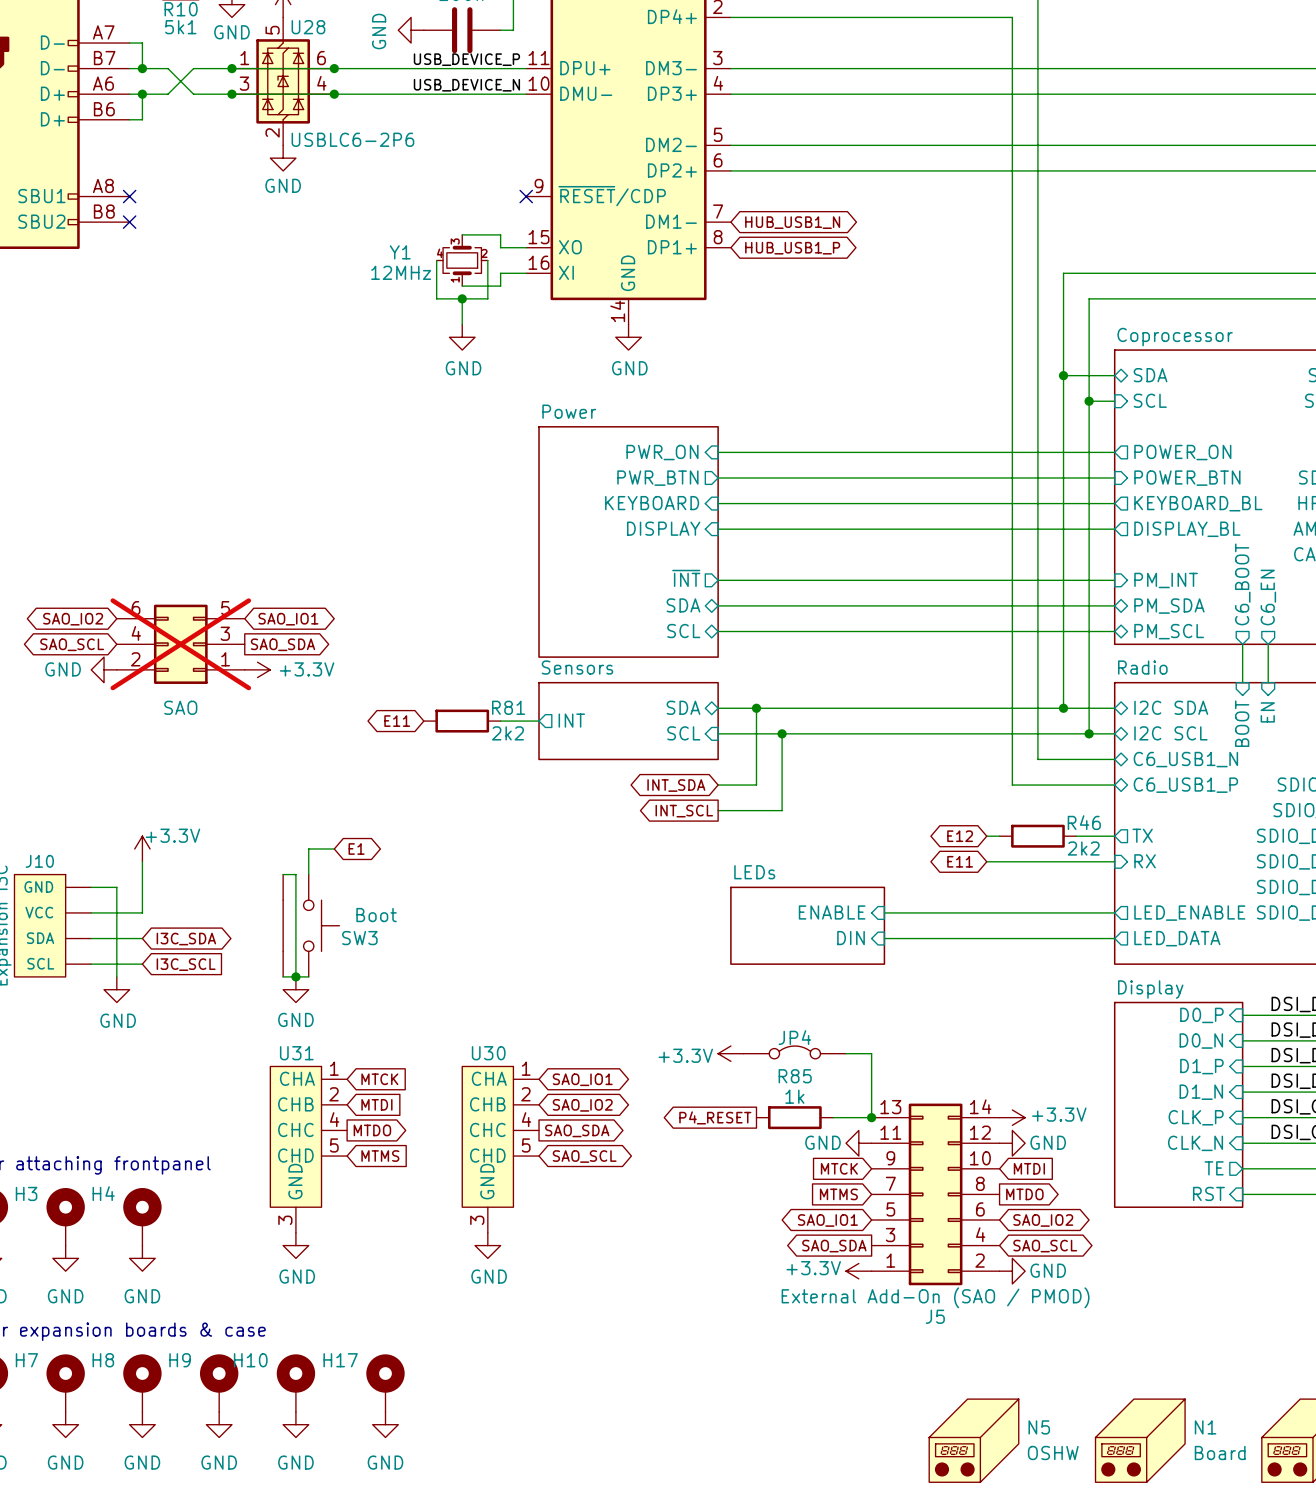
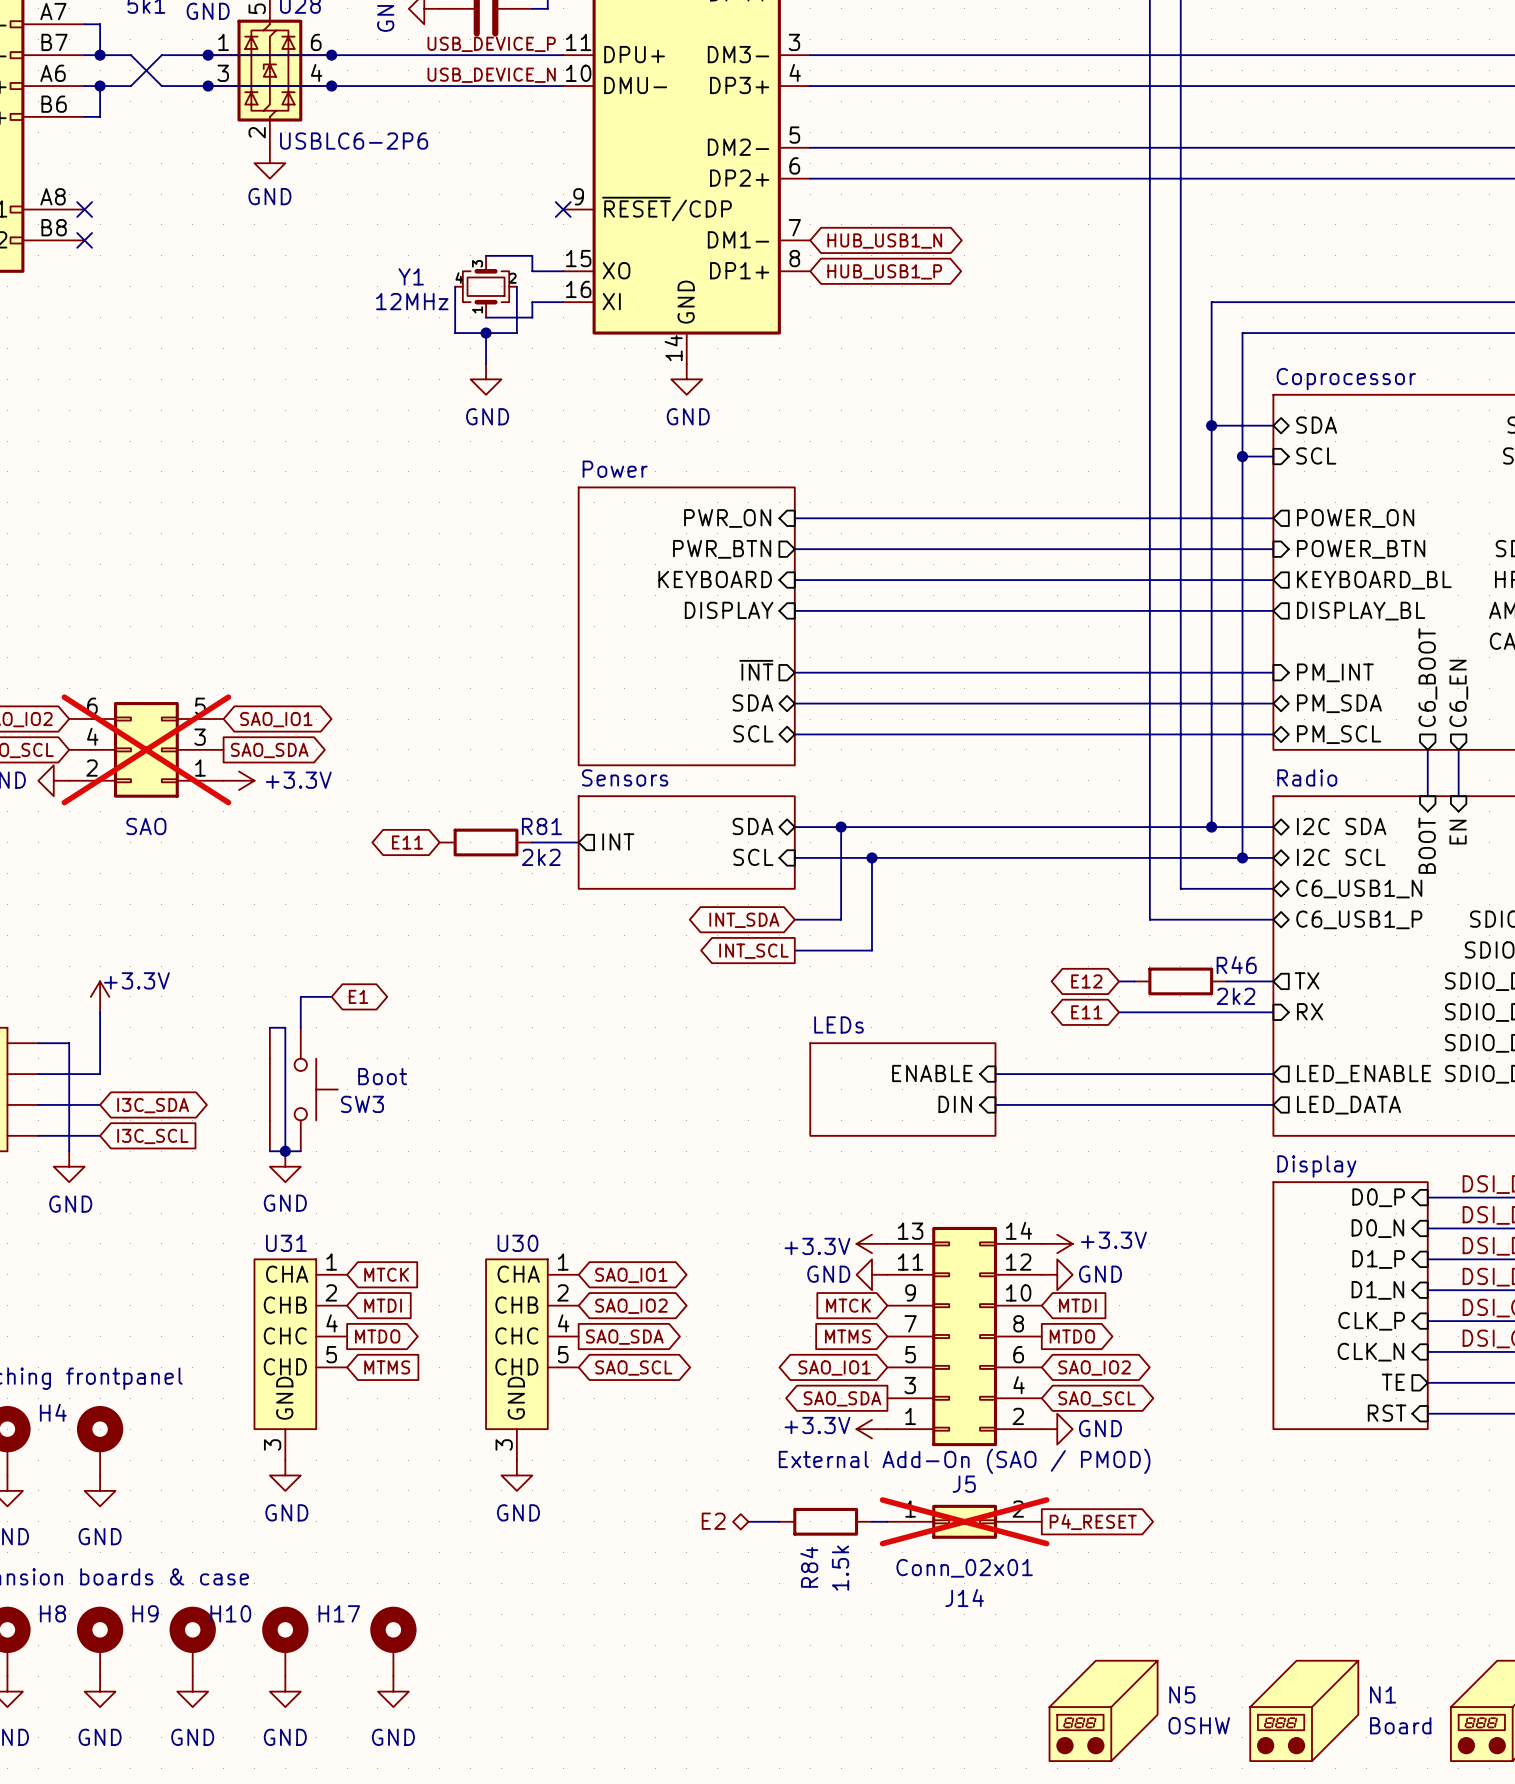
JP4: (794, 1052) -> none
power symbol position: +3.3V (730, 1053) -> +3.3V (871, 1243)
power symbol: none -> GND (871, 1274)
power symbol: none -> GND (1057, 1274)
global label rotation: 0° (715, 1117) -> 180° (1093, 1522)
global label position: P4_RESET (715, 1117) -> P4_RESET (1093, 1522)
R85: 1k (794, 1117) -> none
junction: (871, 1117) -> none
power symbol position: +3.3V (1012, 1117) -> +3.3V (1057, 1243)
power symbol: GND (858, 1143) -> none
power symbol: GND (1012, 1143) -> none
global label position: MTCK (839, 1168) -> MTCK (848, 1305)
global label position: MTDI (1029, 1168) -> MTDI (1077, 1305)
global label position: MTMS (838, 1194) -> MTMS (847, 1336)
J5 position: (935, 1194) -> (964, 1336)
global label position: MTDO (1024, 1194) -> MTDO (1072, 1336)
power symbol: none -> +3.3V (871, 1429)
power symbol: none -> GND (1057, 1429)
global label position: SAO_IO1 (827, 1220) -> SAO_IO1 (834, 1367)
global label position: SAO_IO2 (1043, 1220) -> SAO_IO2 (1094, 1367)
global label position: SAO_SDA (834, 1246) -> SAO_SDA (842, 1398)
global label position: SAO_SCL (1045, 1246) -> SAO_SCL (1096, 1398)
power symbol: +3.3V (858, 1271) -> none
power symbol: GND (1012, 1271) -> none
hierarchical label: none -> E2 (713, 1521)
wire: none -> (748, 1521) (779, 1521)
R84: none -> 1.5k (825, 1521)
wire: none -> (871, 1521) (887, 1521)
J14: none -> Conn_02x01 (964, 1521)

